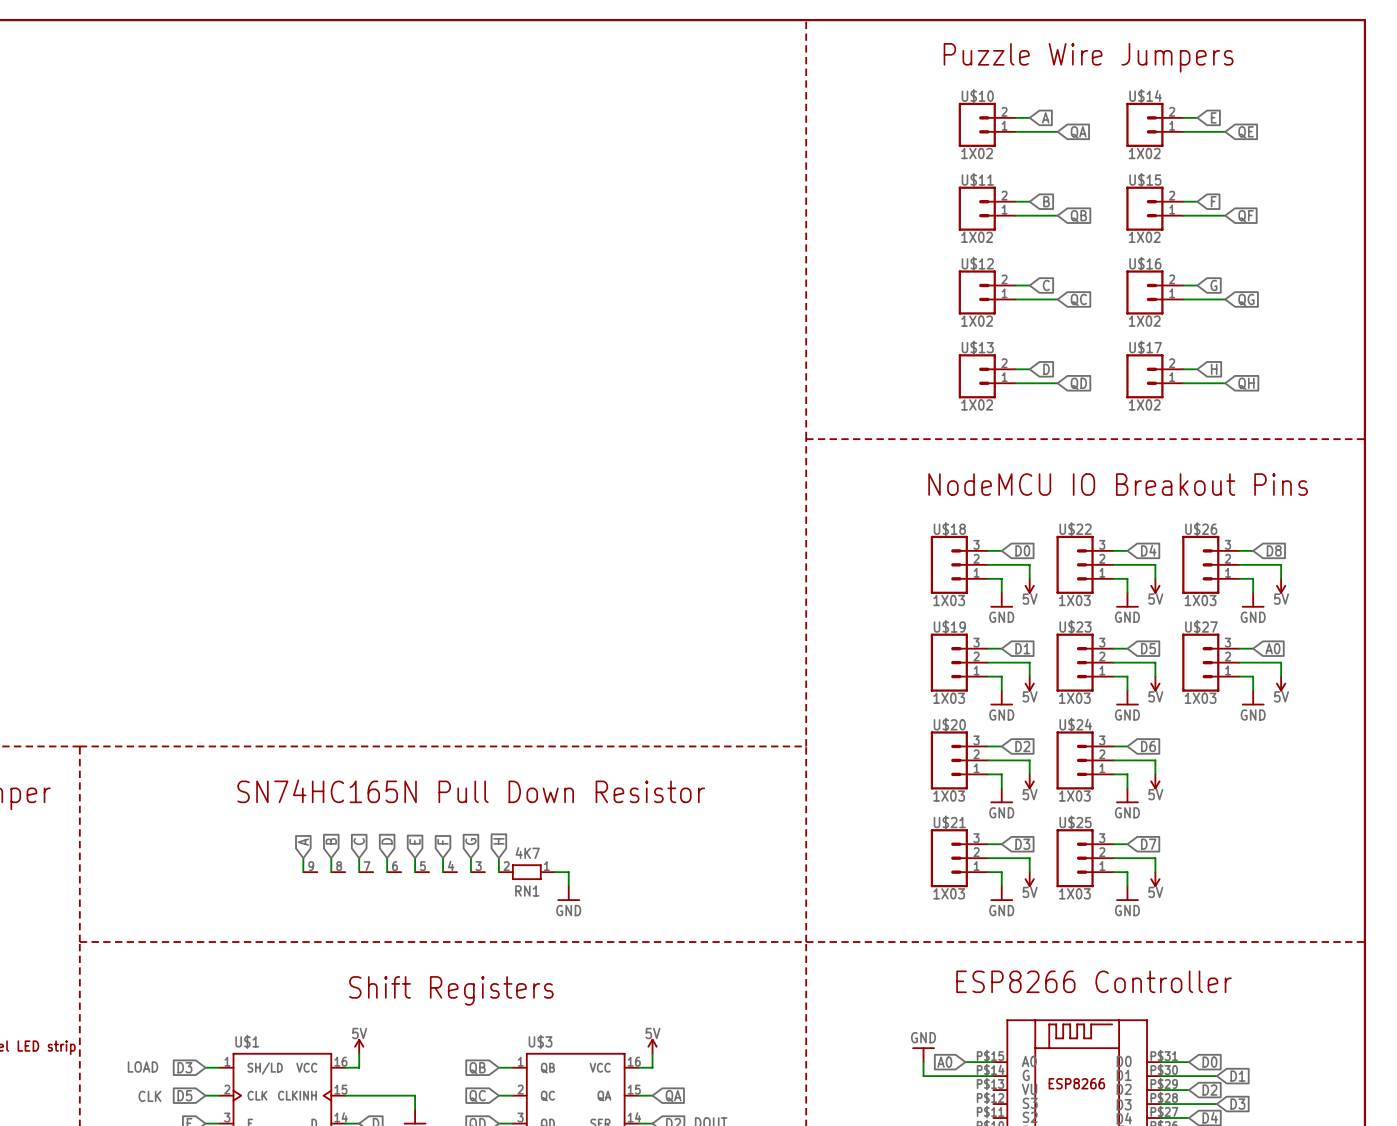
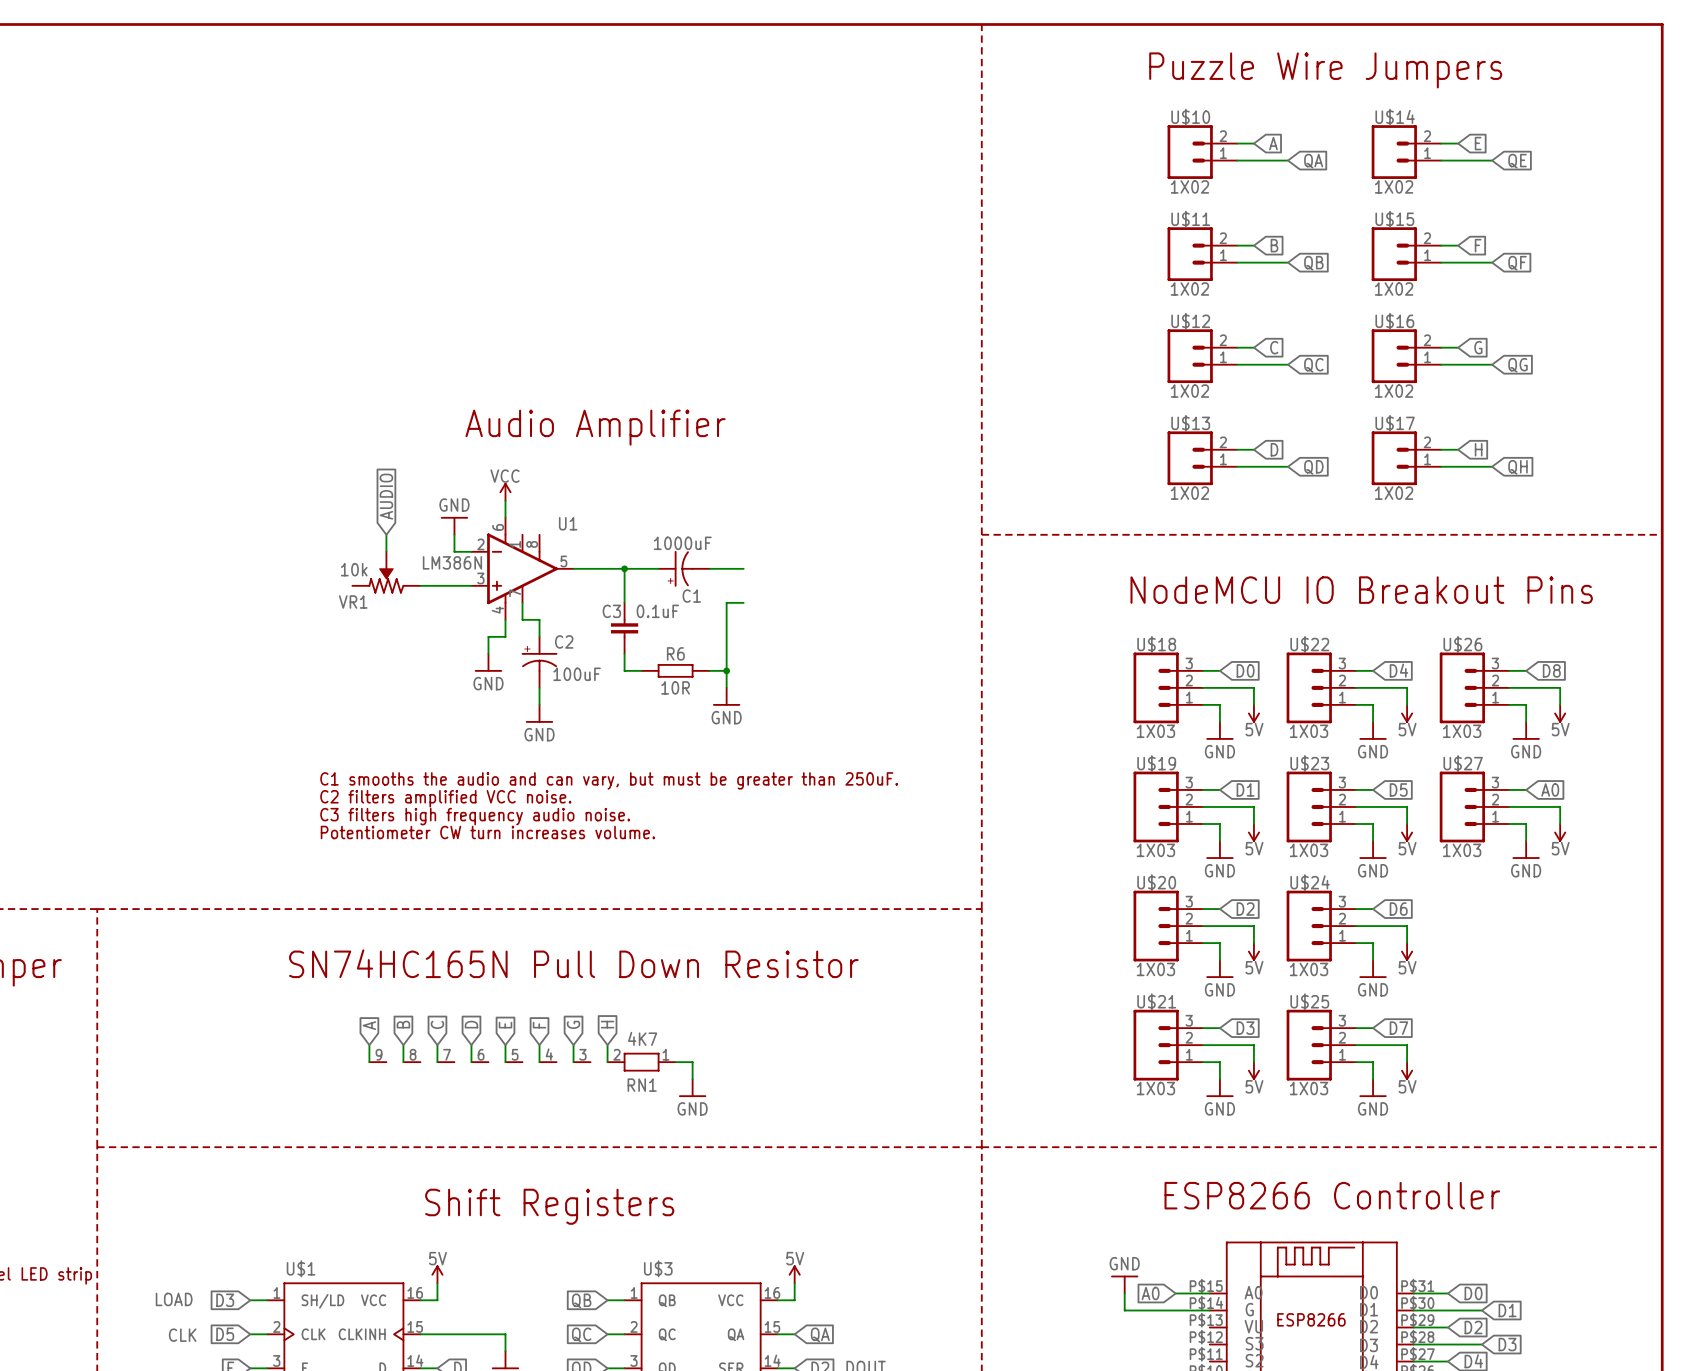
text: none -> Audio Amplifier (595, 427)
power symbol: none -> VCC (505, 491)
global label: none -> AUDIO (386, 496)
wire: none -> (505, 500) (505, 517)
power symbol: none -> GND (454, 525)
wire: none -> (386, 534) (386, 551)
wire: none -> (454, 534) (454, 551) (471, 551)
U1: none -> LM386N (522, 568)
wire: none -> (573, 568) (658, 568)
wire: none -> (624, 568) (624, 602)
junction: none -> (624, 568)
C1: none -> 1000uF (684, 568)
wire: none -> (709, 568) (743, 568)
VR1: none -> 10k (386, 572)
wire: none -> (420, 585) (471, 585)
wire: none -> (522, 602) (522, 619) (539, 619) (539, 636)
wire: none -> (743, 602) (726, 602) (726, 687)
wire: none -> (505, 619) (505, 636) (488, 636) (488, 653)
C3: none -> 0.1uF (624, 628)
wire: none -> (624, 653) (624, 670) (641, 670)
C2: none -> 100uF (539, 662)
power symbol: none -> GND (488, 662)
R6: none -> 10R (675, 670)
wire: none -> (709, 670) (726, 670)
junction: none -> (726, 670)
wire: none -> (539, 687) (539, 704)
power symbol: none -> GND (726, 696)
power symbol: none -> GND (539, 713)
text: none -> C1 smooths the audio and can vary, but must be greater than 250uF. (609, 780)
text: none -> C2 filters amplified VCC noise. (445, 798)
text: none -> C3 filters high frequency audio noise. (475, 816)
text: none -> Potentiometer CW turn increases volume. (487, 832)

